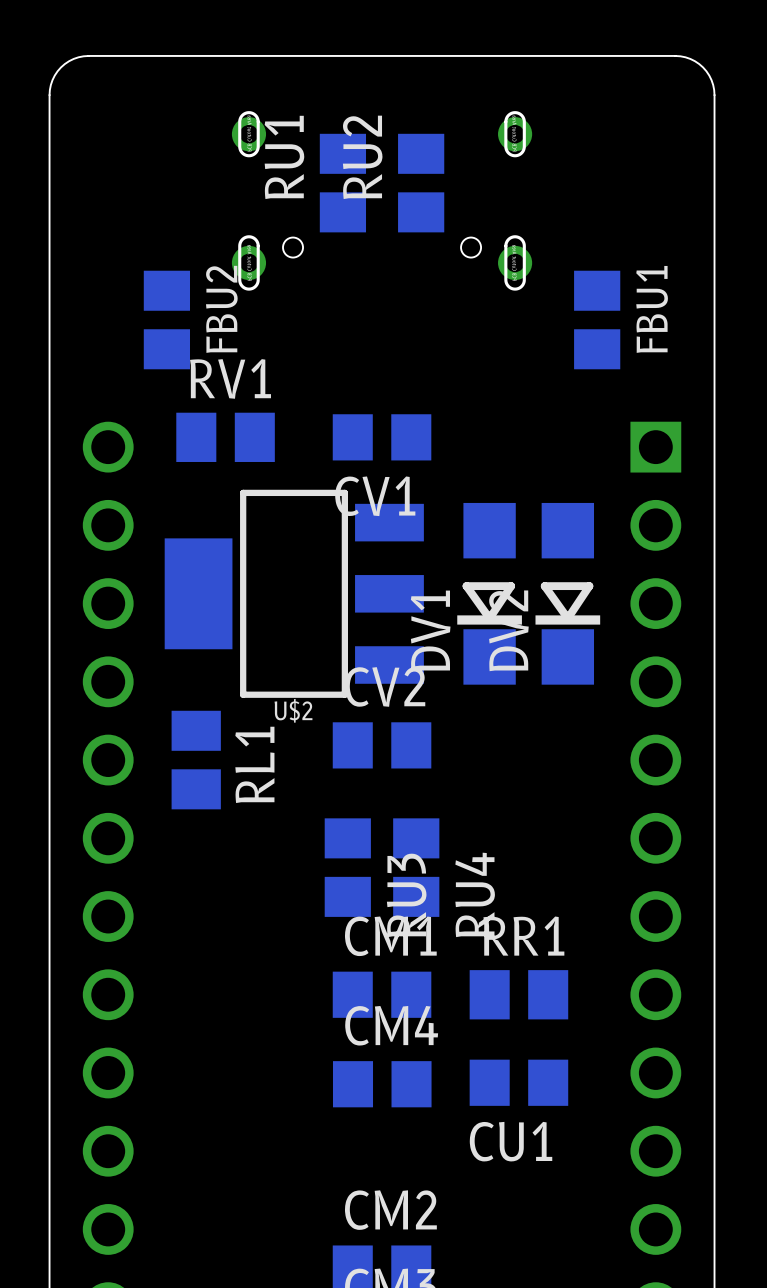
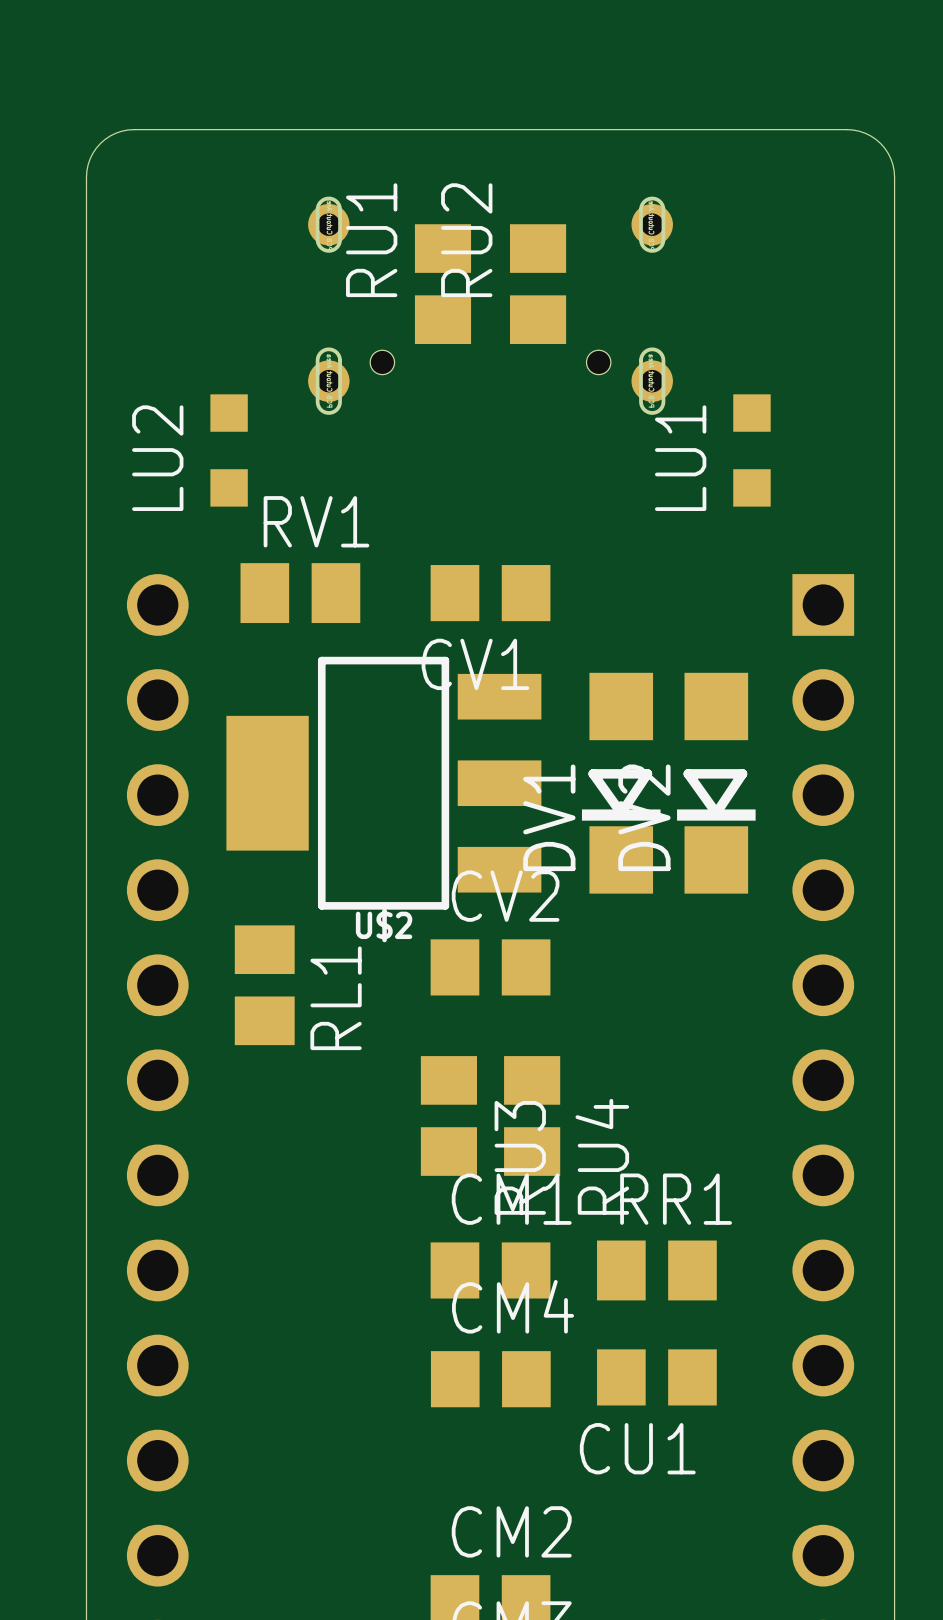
FBU2: (166, 320) -> none
LU2: none -> (229, 450)
FBU1: (597, 320) -> none
LU1: none -> (751, 450)

